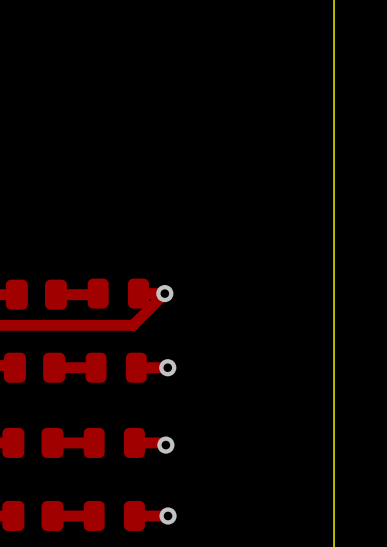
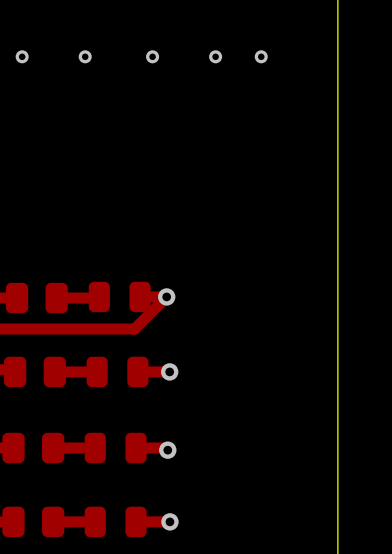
via: none -> (22, 56)
via: none -> (85, 56)
via: none -> (152, 56)
via: none -> (215, 56)
via: none -> (261, 56)

